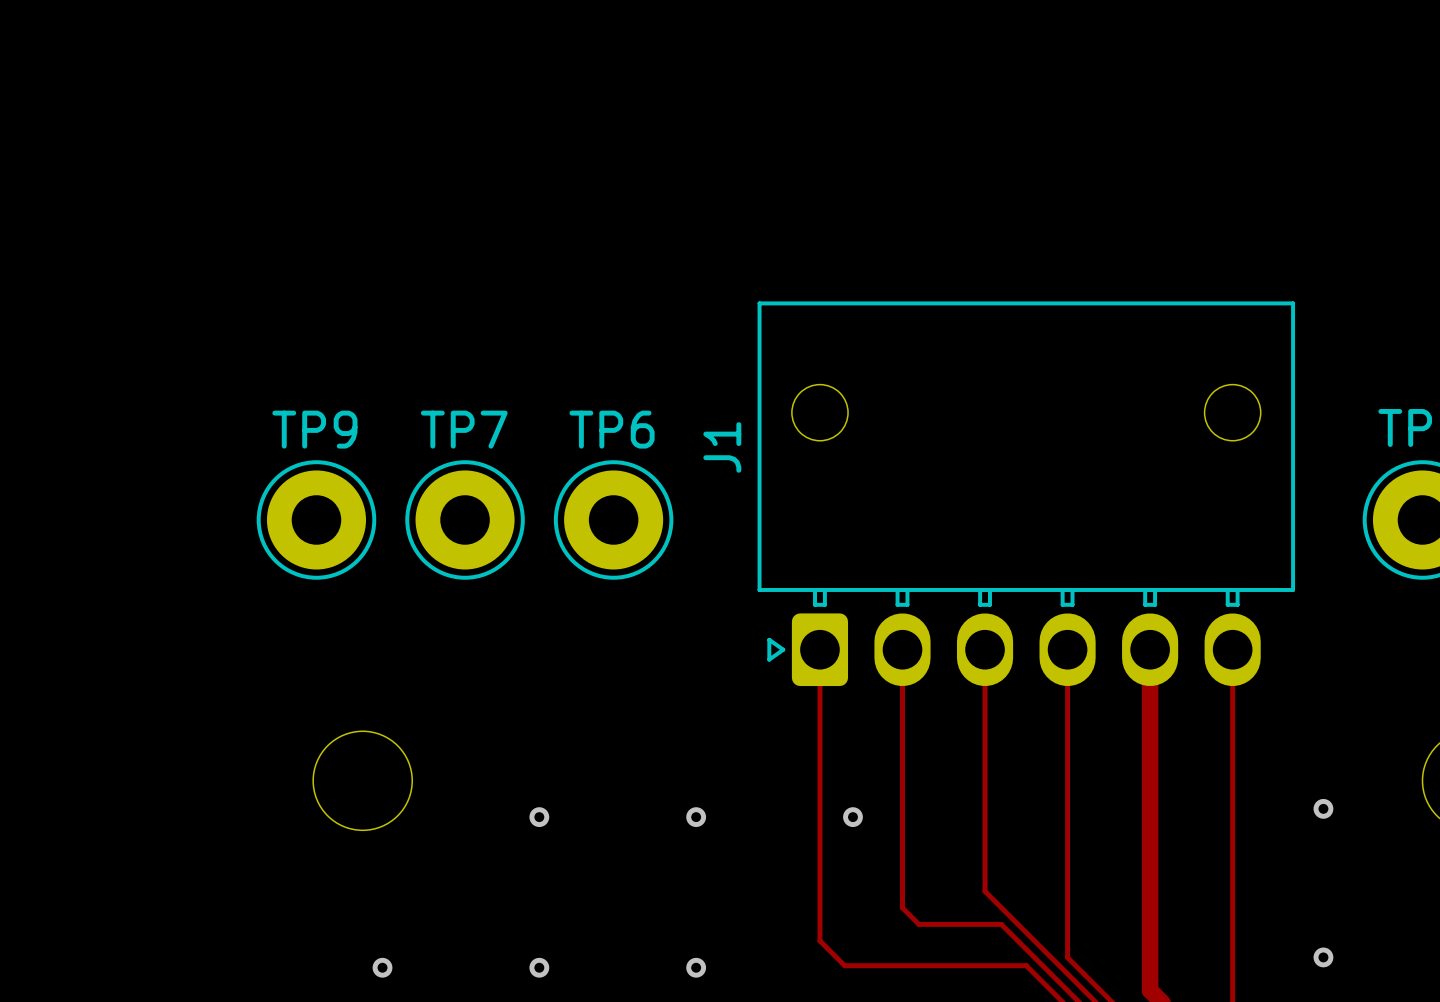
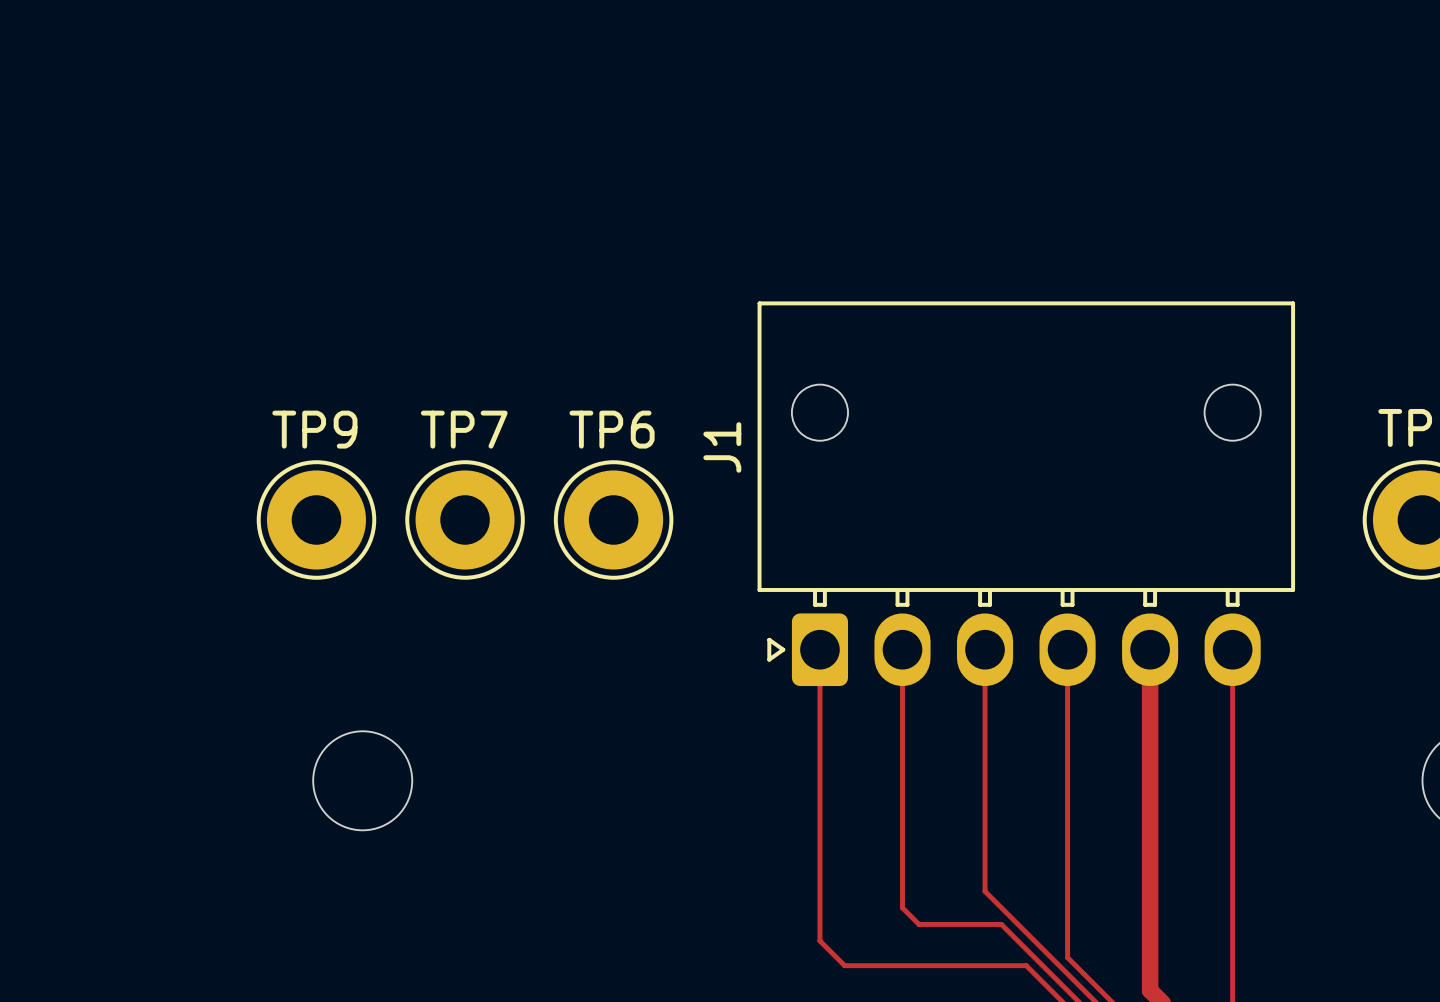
via: (1323, 808) -> none
via: (539, 817) -> none
via: (696, 817) -> none
via: (852, 817) -> none
via: (1323, 957) -> none
via: (382, 967) -> none
via: (539, 967) -> none
via: (696, 967) -> none

